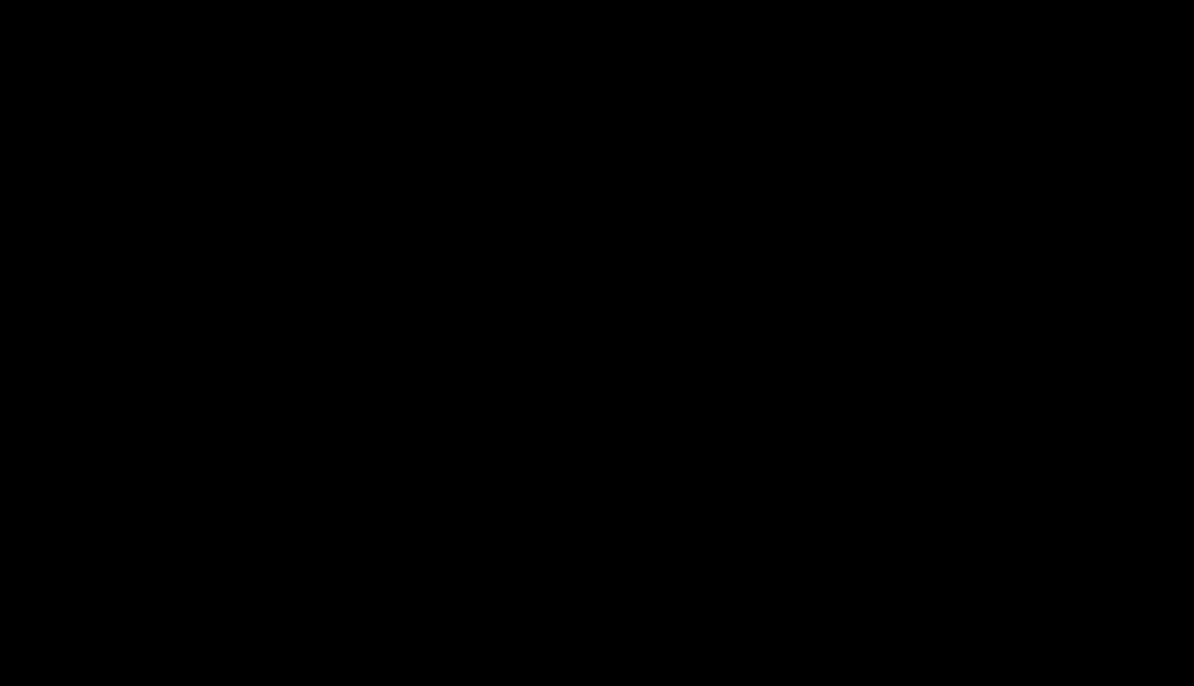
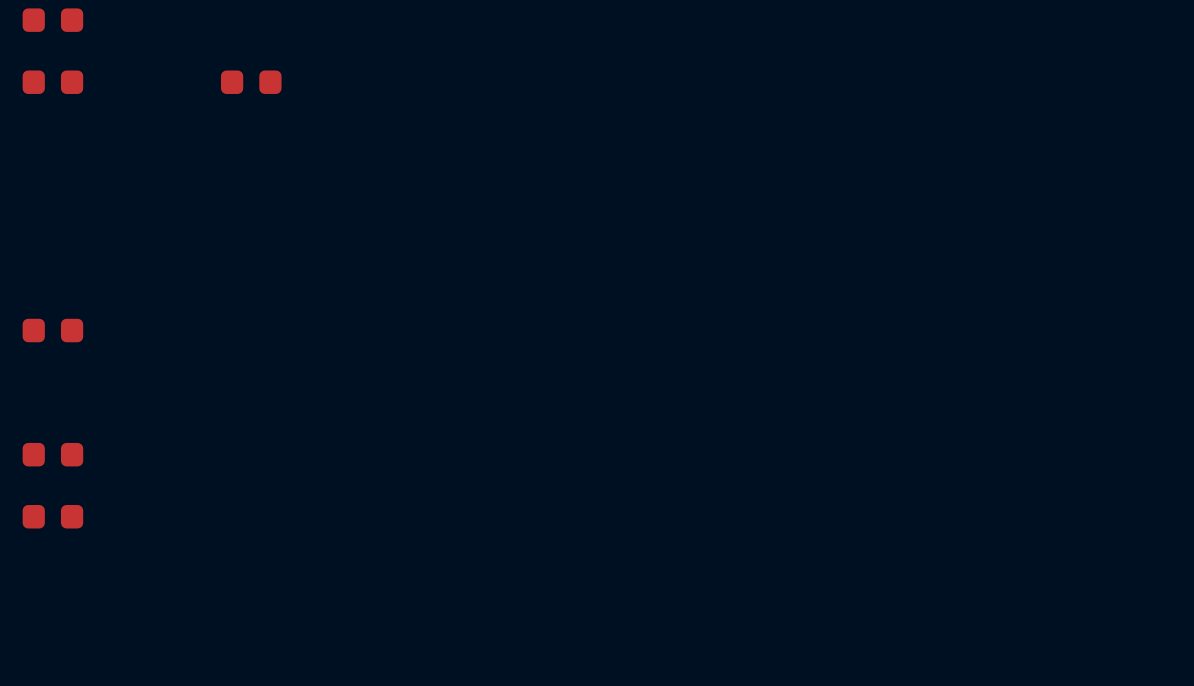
part: none -> (52, 20)
part: none -> (52, 82)
part: none -> (251, 82)
part: none -> (52, 330)
part: none -> (52, 454)
part: none -> (52, 516)

